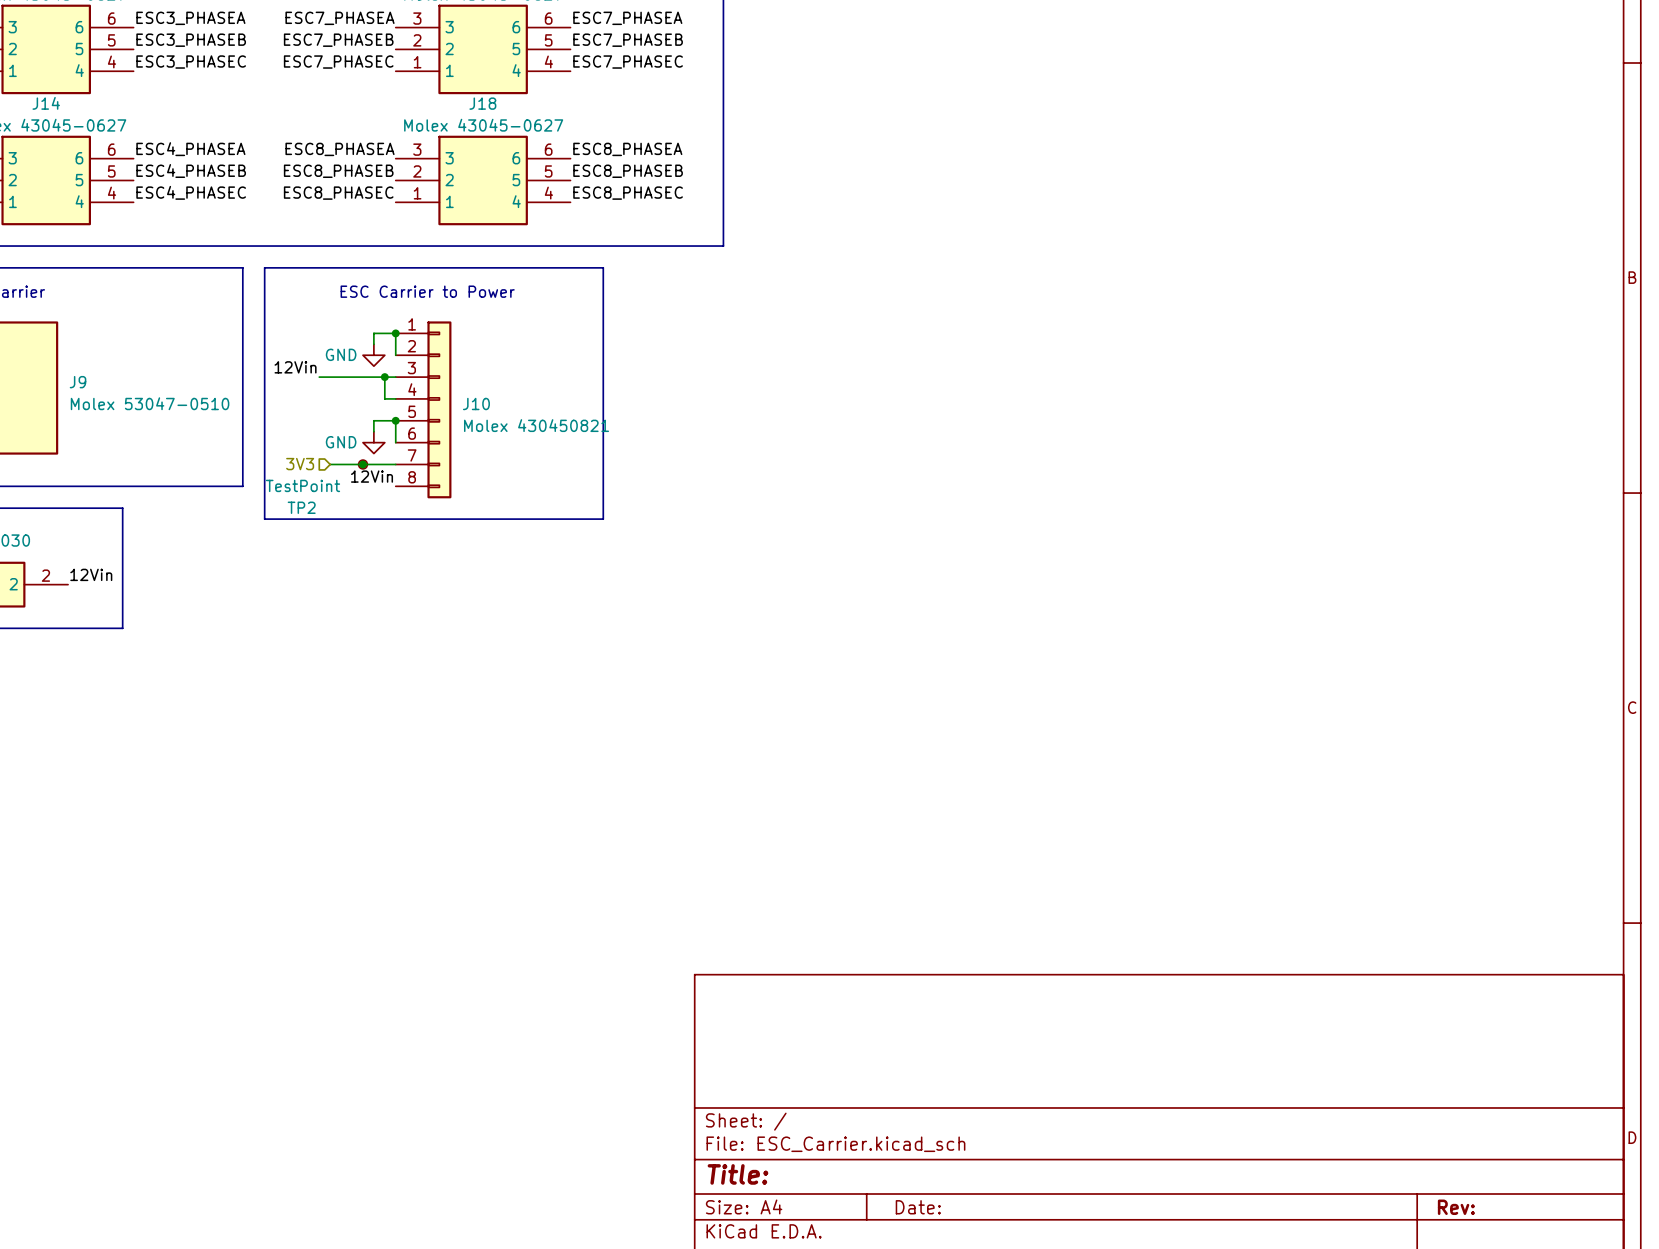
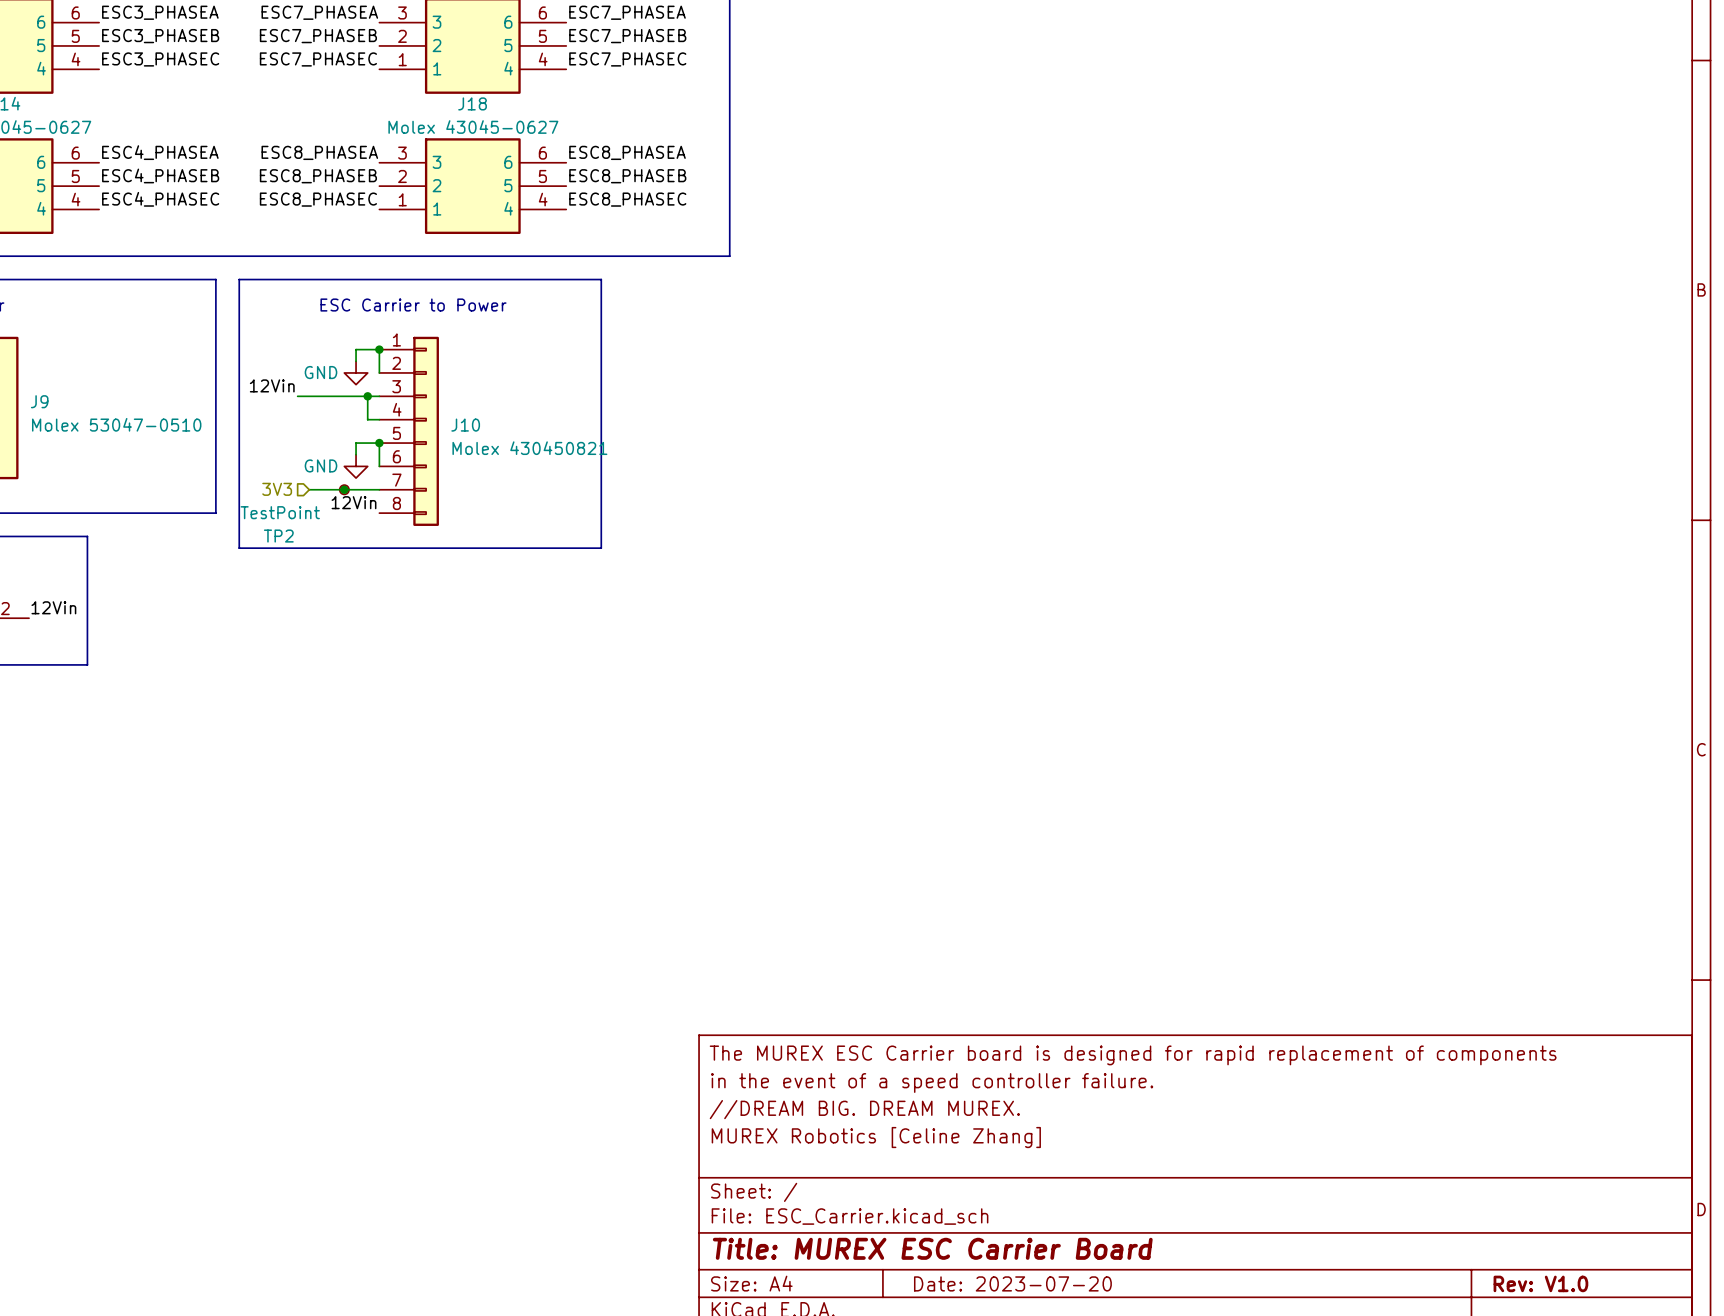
title block: none -> The MUREX ESC Carrier board is designed for rapid replacement of components (1133, 1055)
title block: none -> in the event of a speed controller failure. (932, 1083)
title block: none -> //DREAM BIG. DREAM MUREX. (864, 1109)
title block: none -> MUREX Robotics [Celine Zhang] (876, 1137)
title block: Title: (737, 1174) -> Title: MUREX ESC Carrier Board (932, 1248)
title block: Date: (918, 1207) -> Date: 2023-07-20 (1012, 1283)
title block: Rev: (1456, 1207) -> Rev: V1.0 (1540, 1283)

